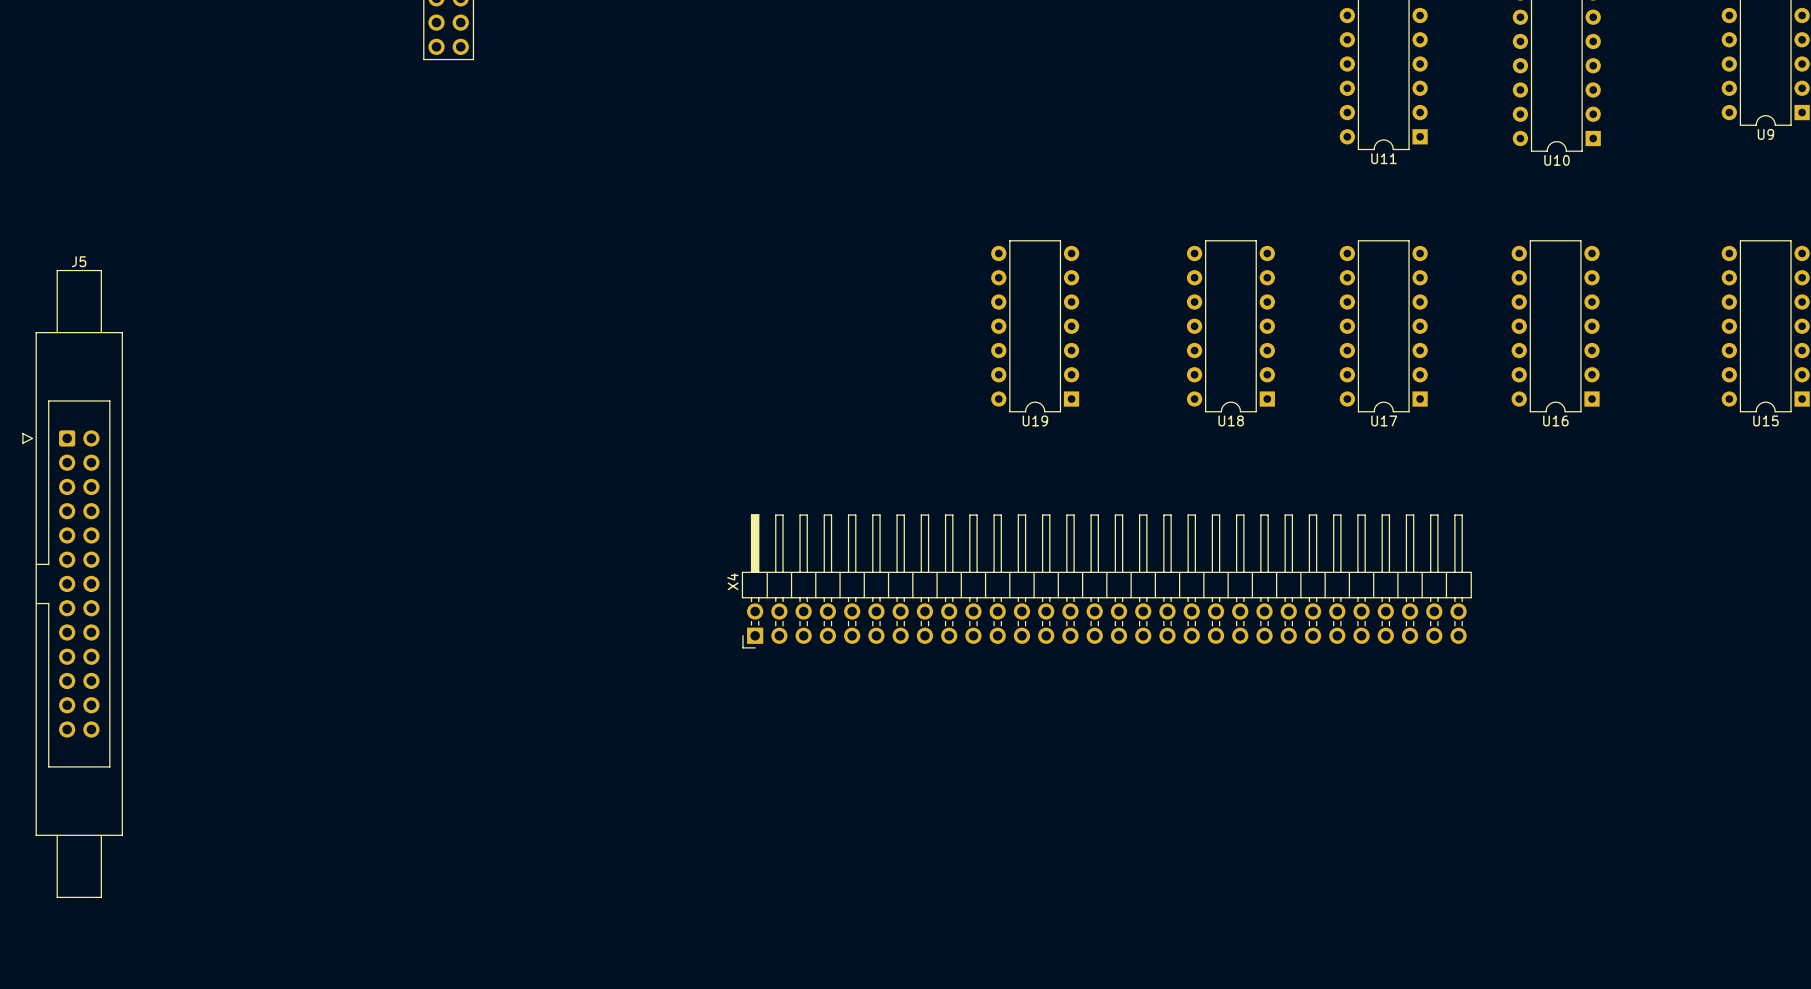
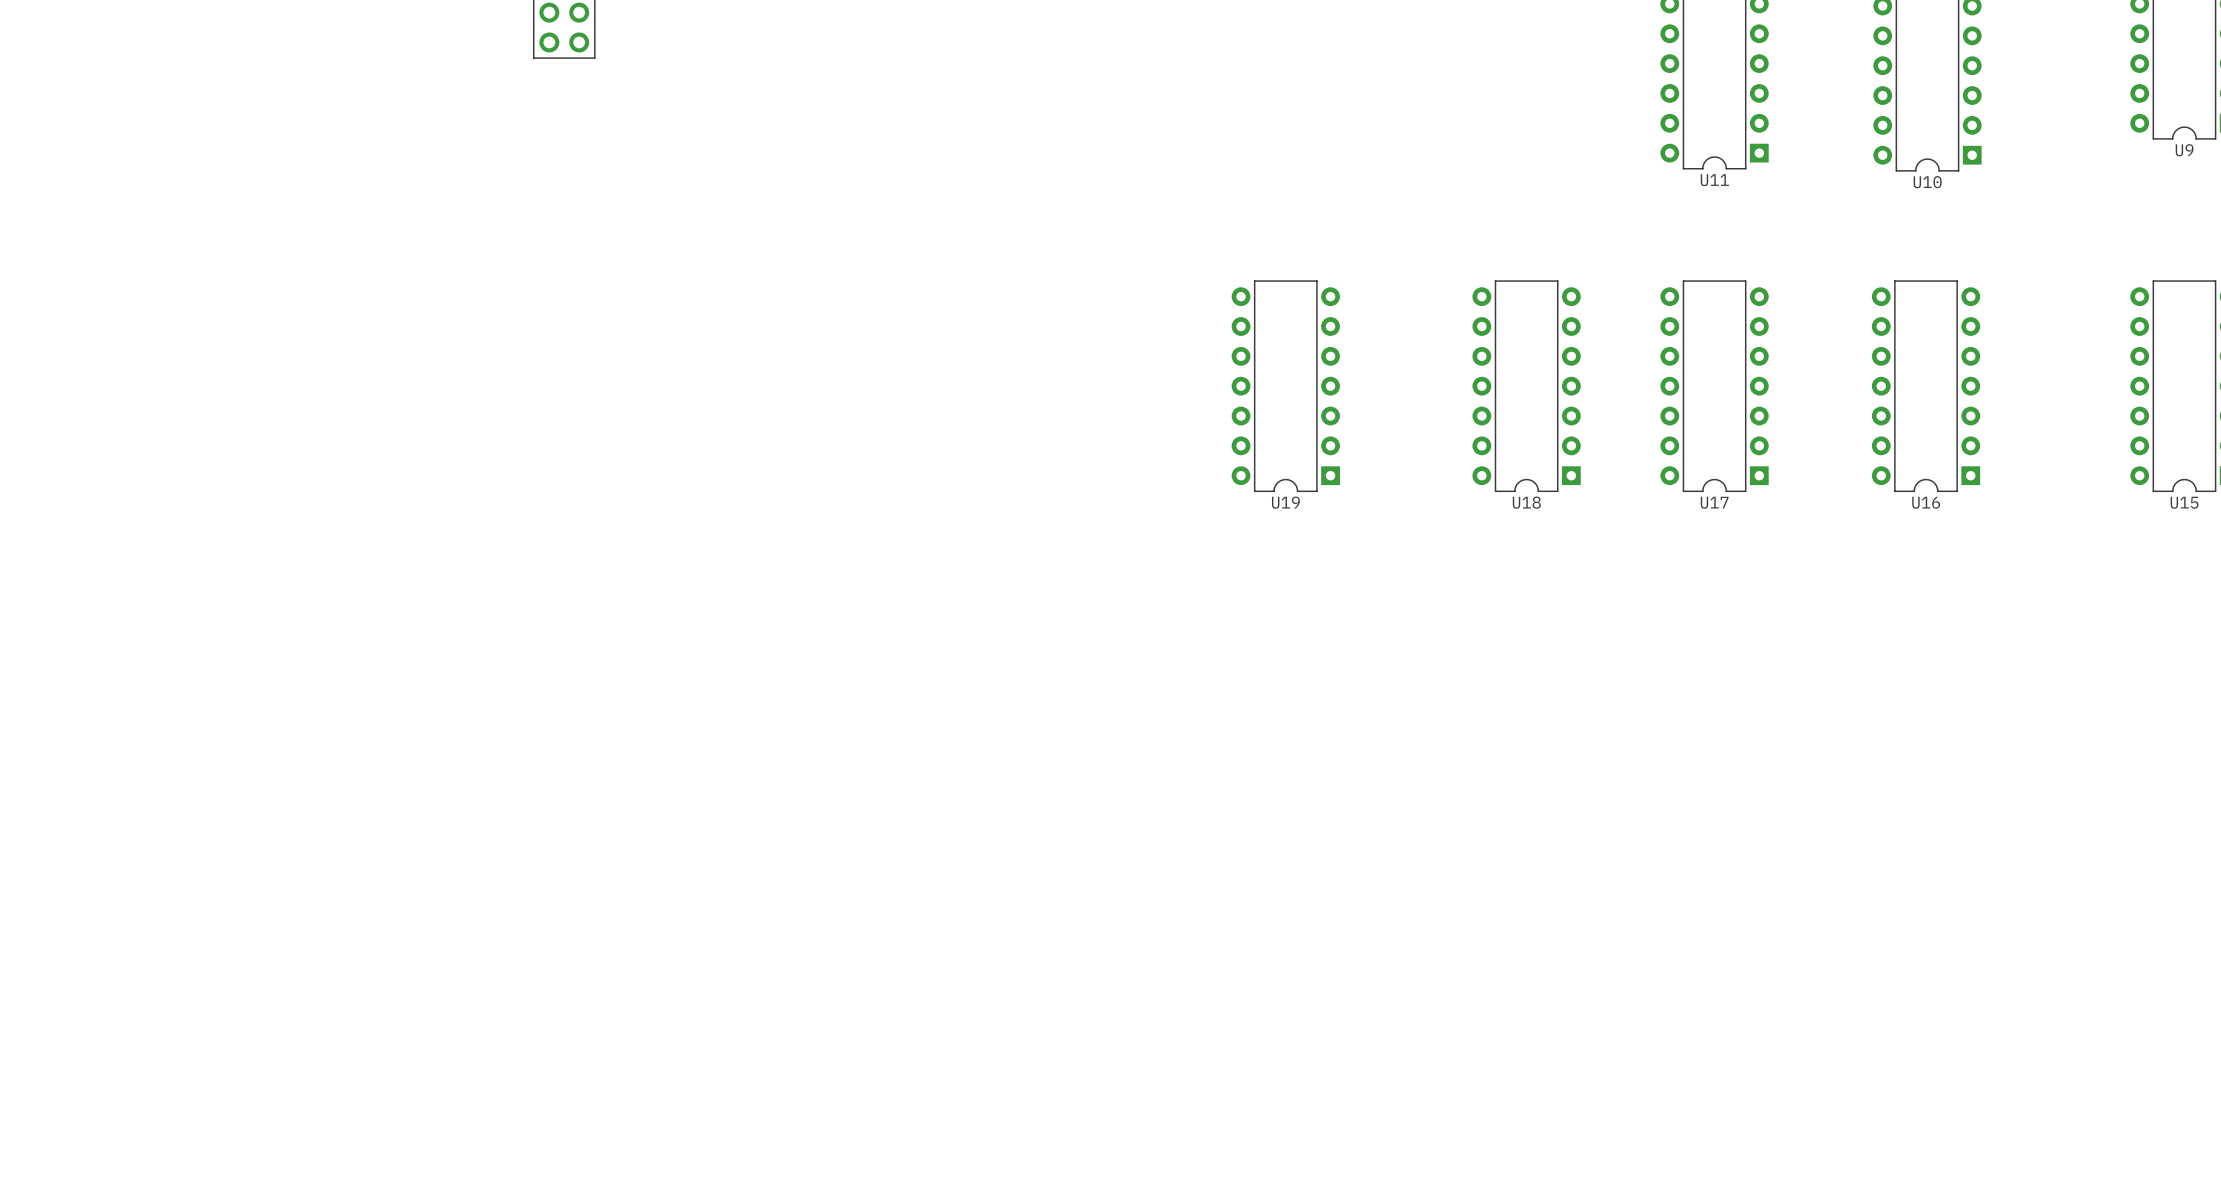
X4: (1106, 581) -> none
J5: (72, 583) -> none

